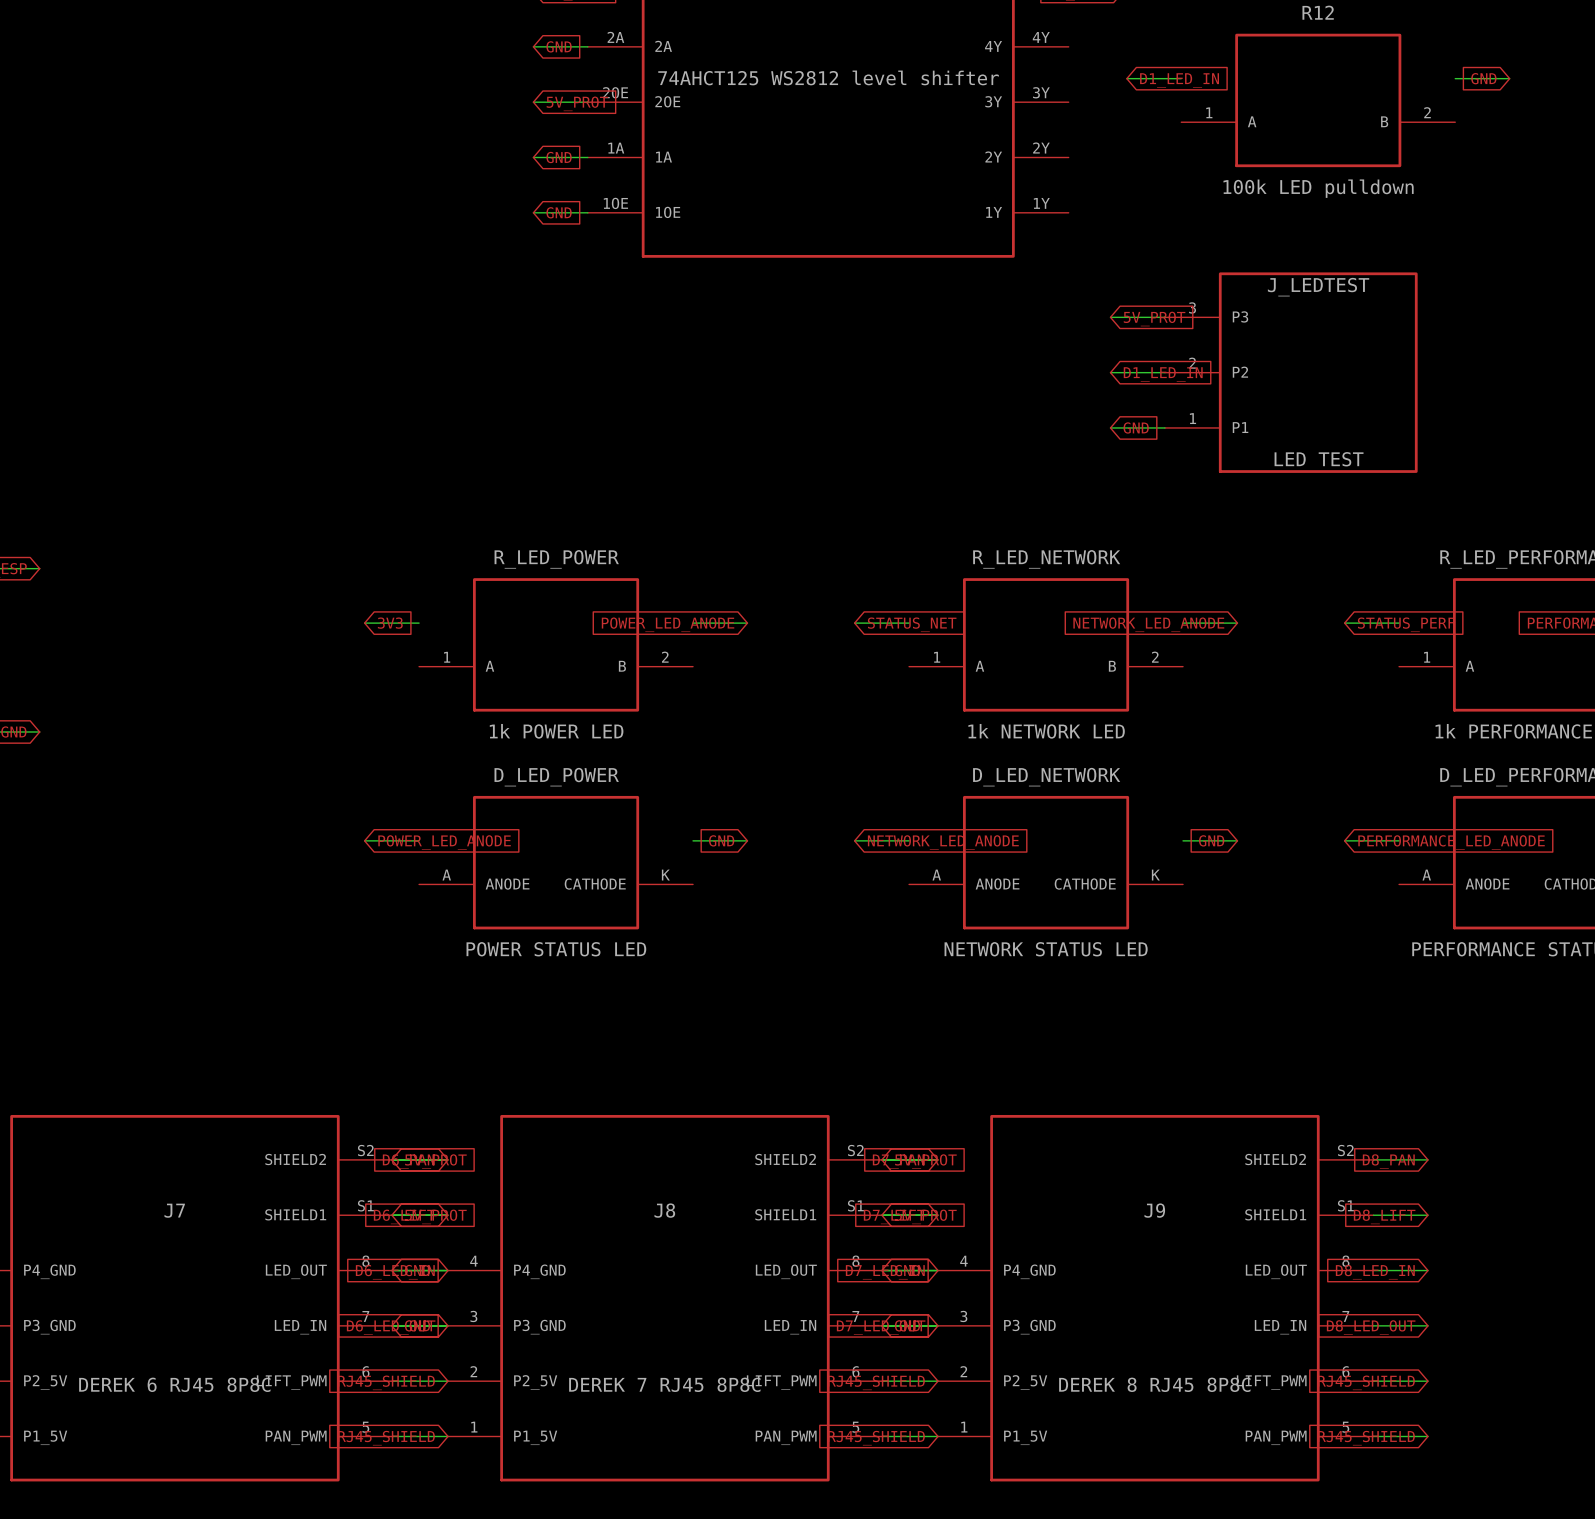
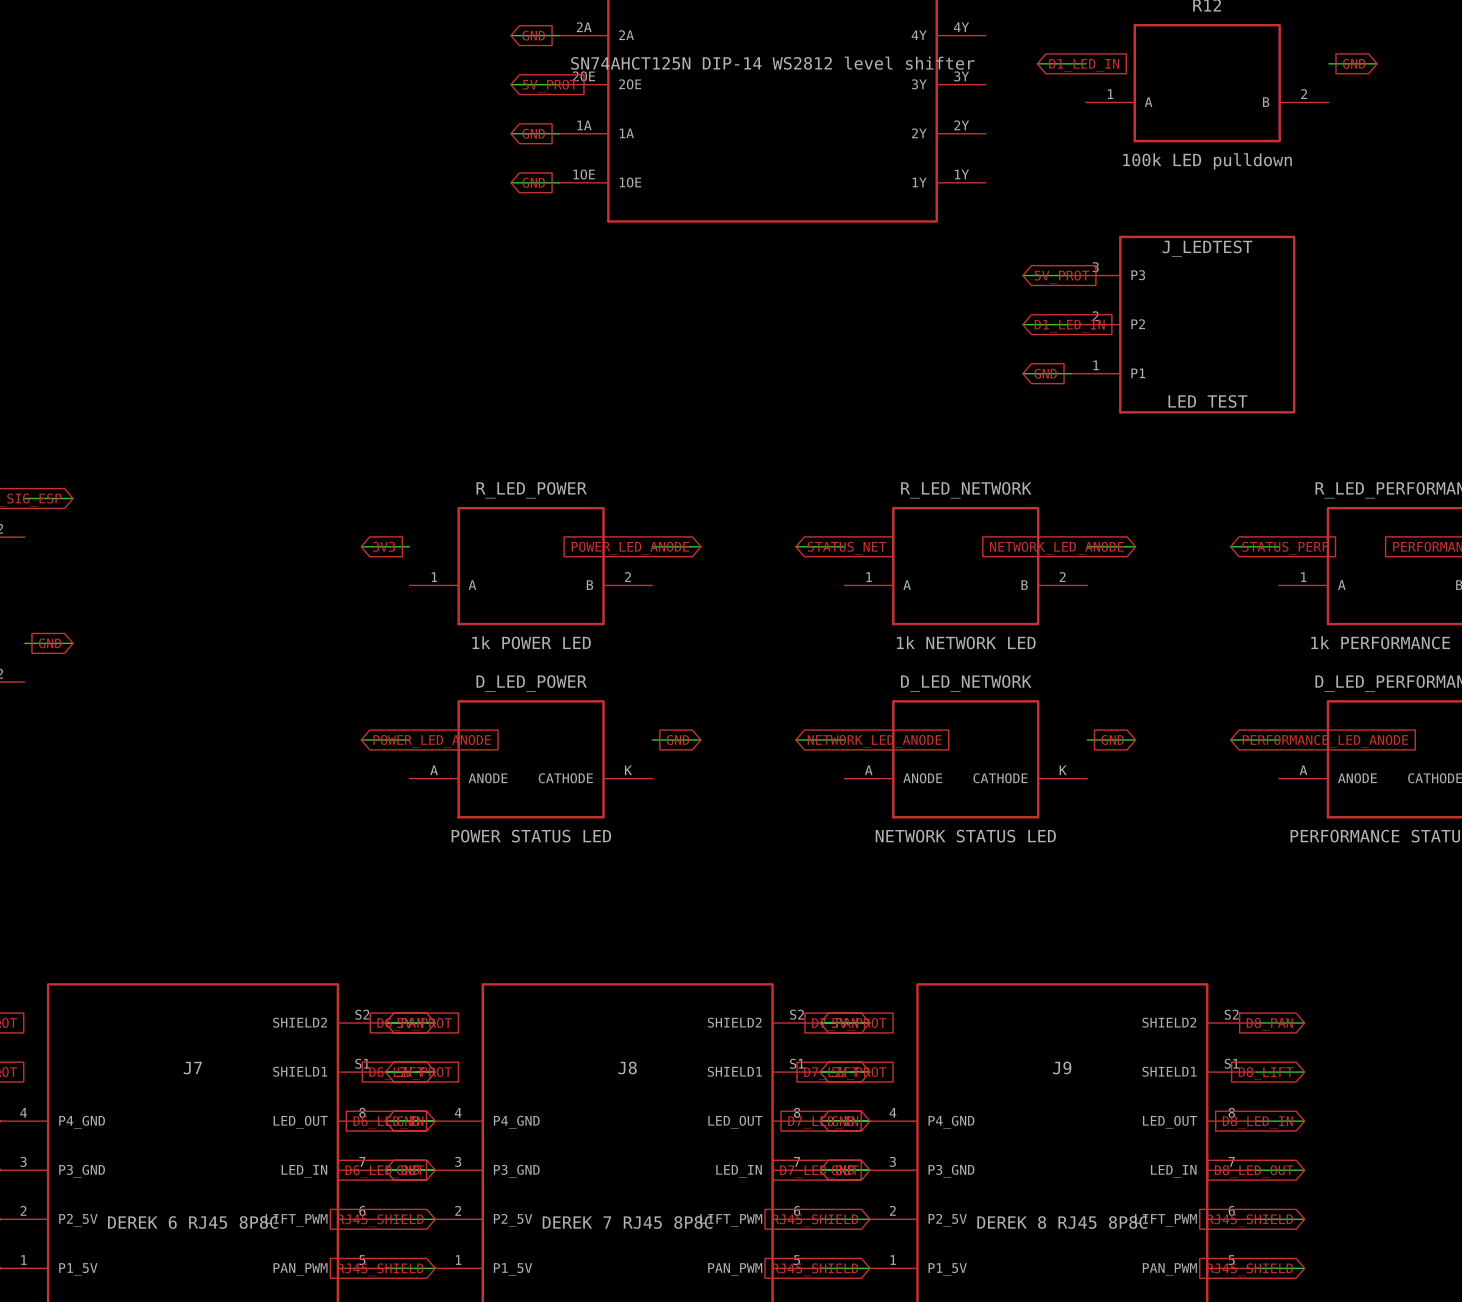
part value: 74AHCT125 WS2812 level shifter (828, 77) -> SN74AHCT125N DIP-14 WS2812 level shifter (772, 63)

